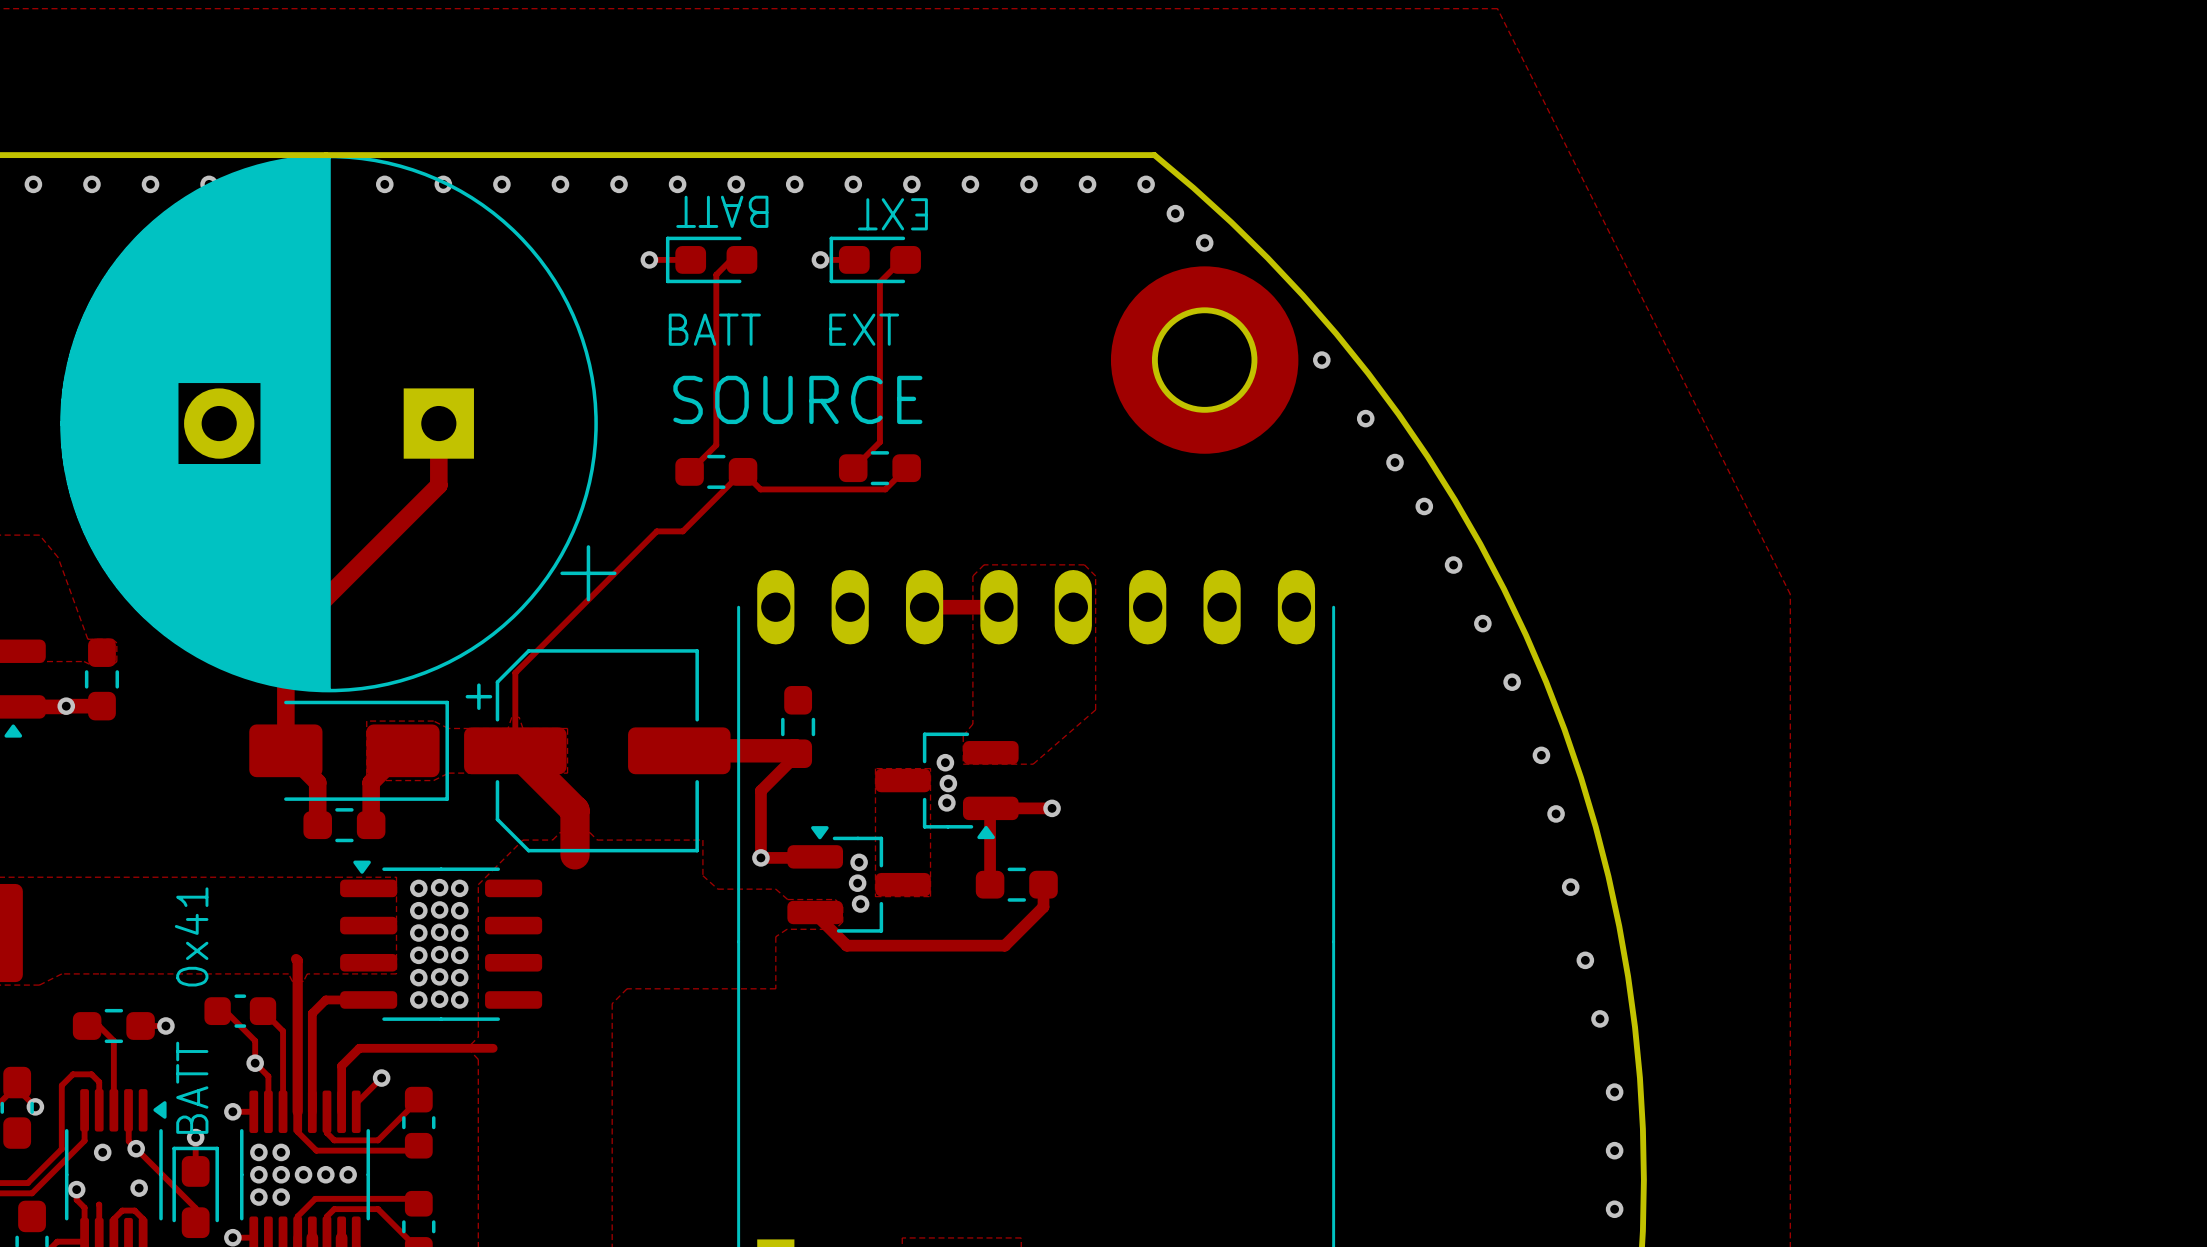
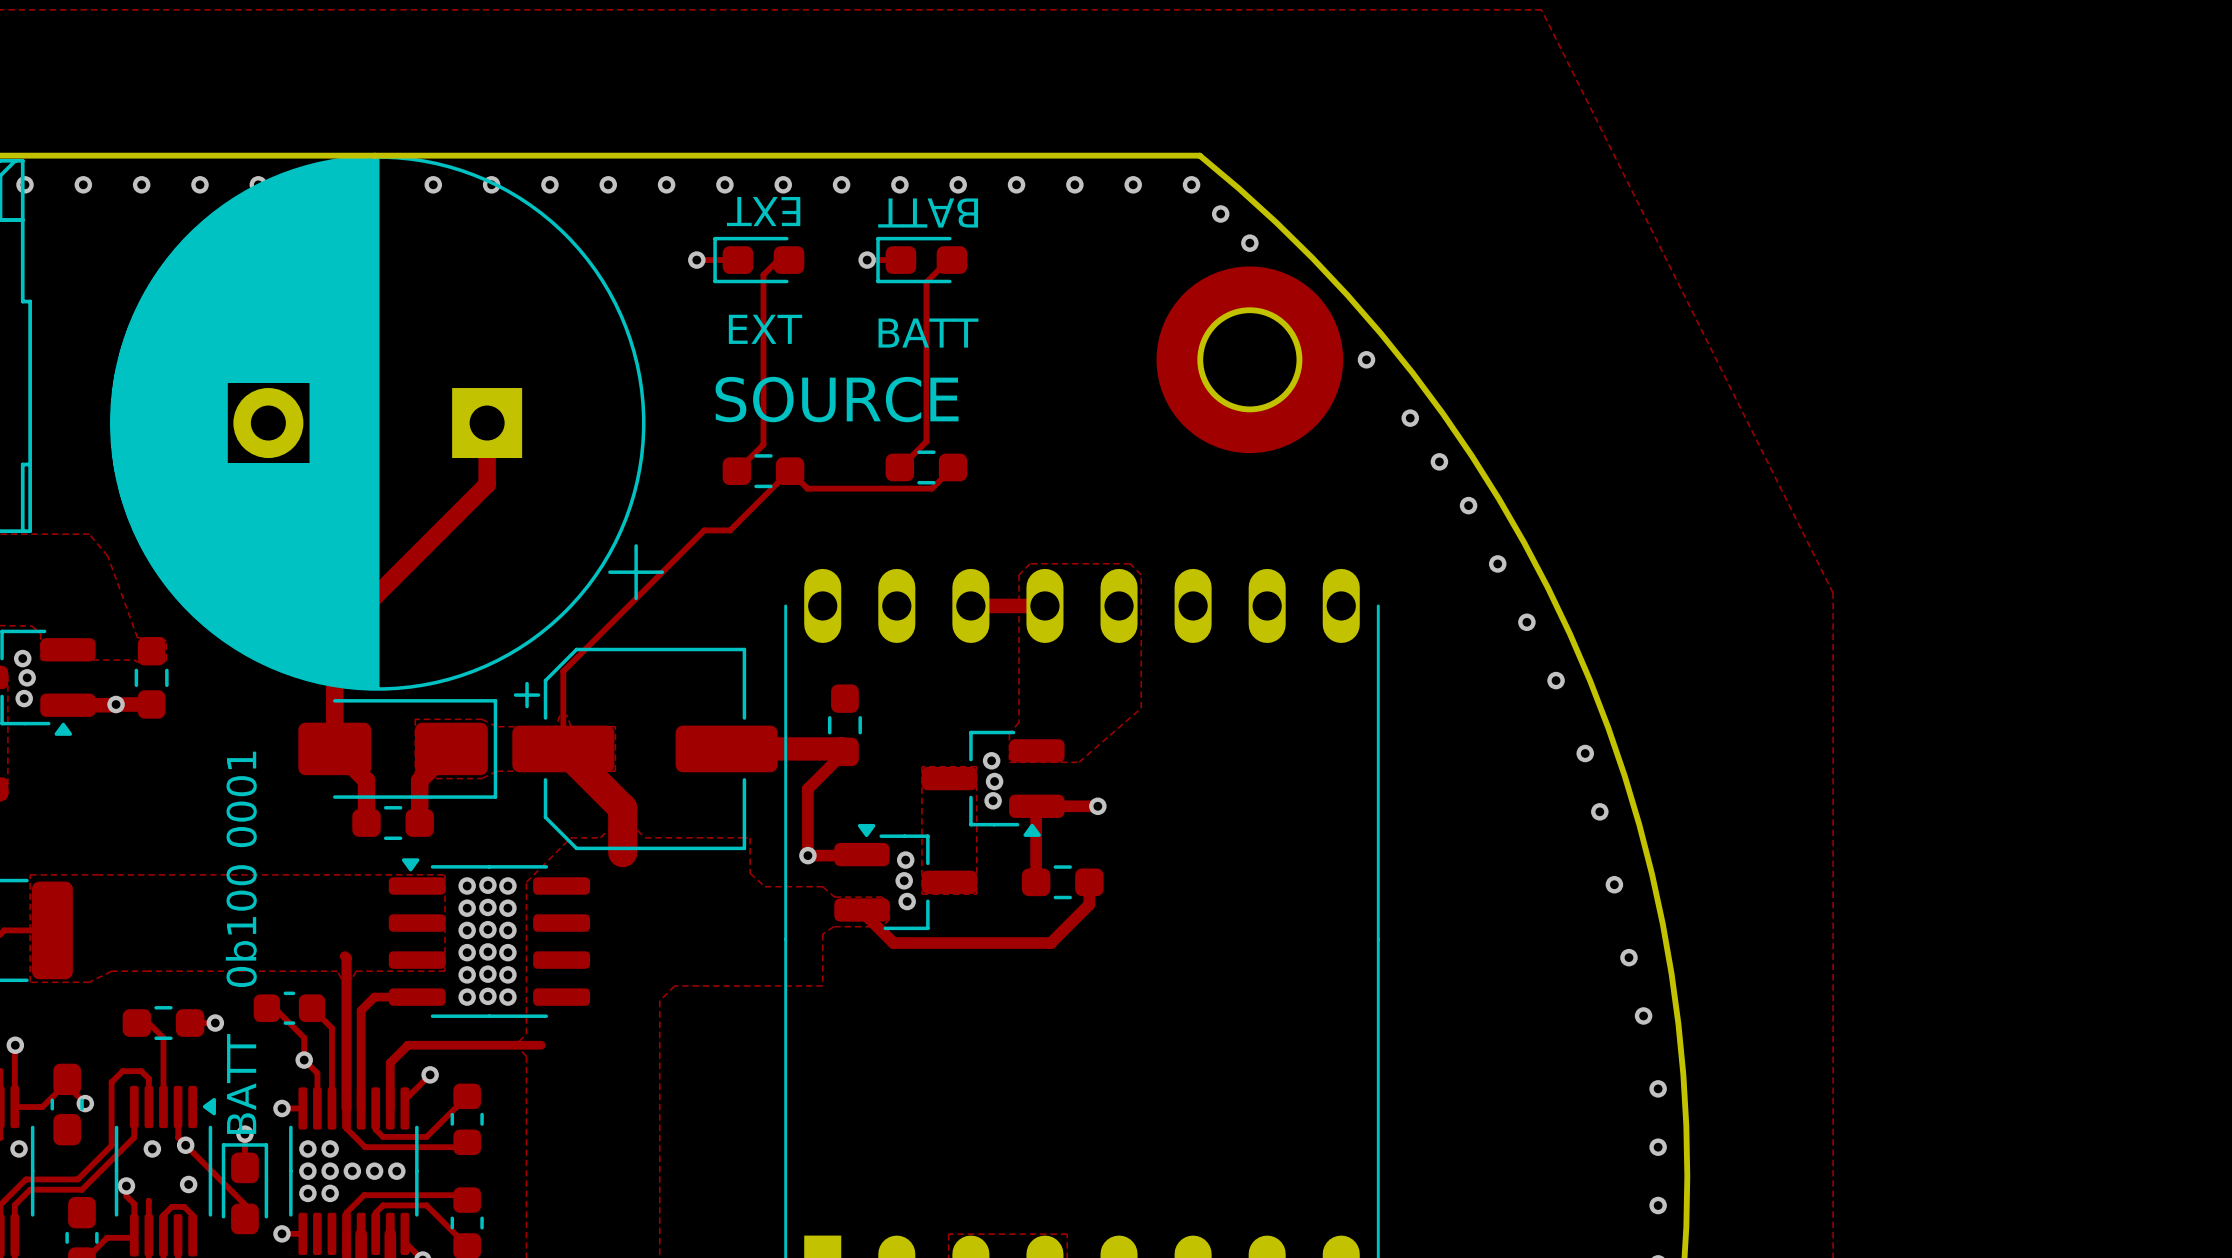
text position: BATT (722, 211) -> BATT (928, 213)
text position: EXT (892, 214) -> EXT (763, 211)
text: BATT (714, 329) -> EXT (765, 329)
text: EXT (864, 329) -> BATT (928, 333)
text: 0x41 (191, 936) -> 0b100 0001 (241, 869)

